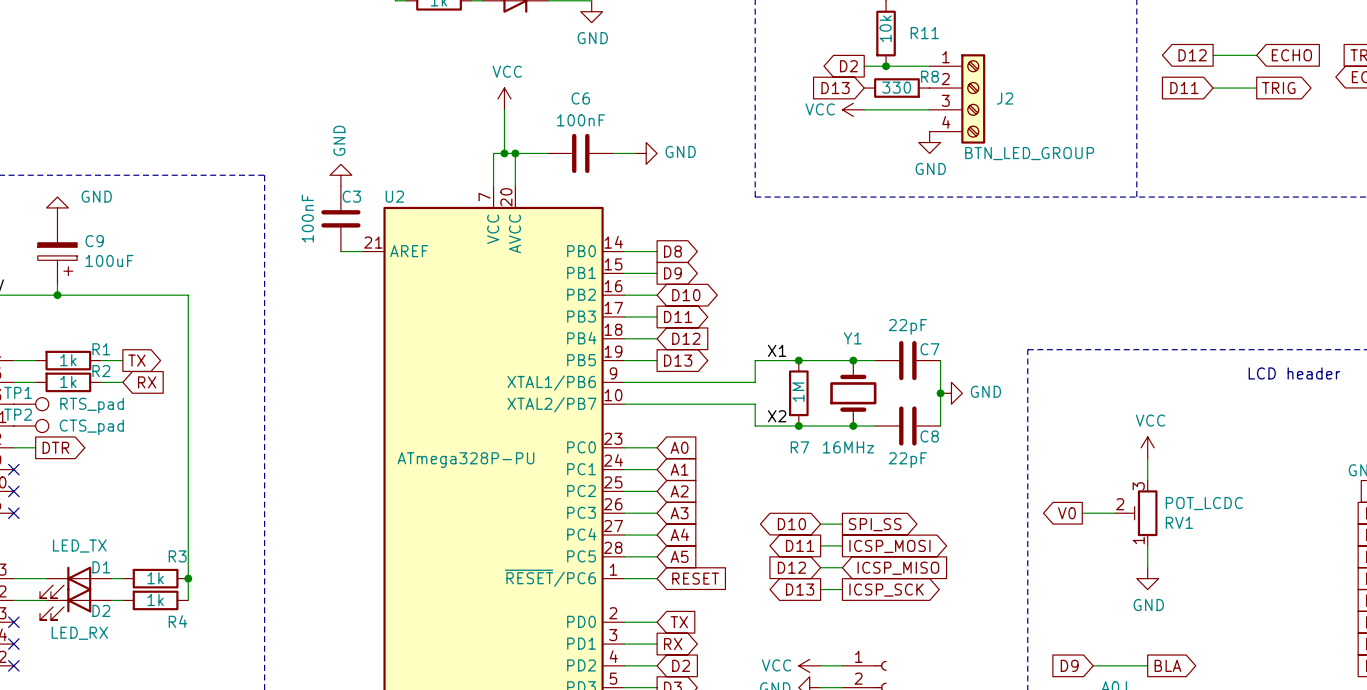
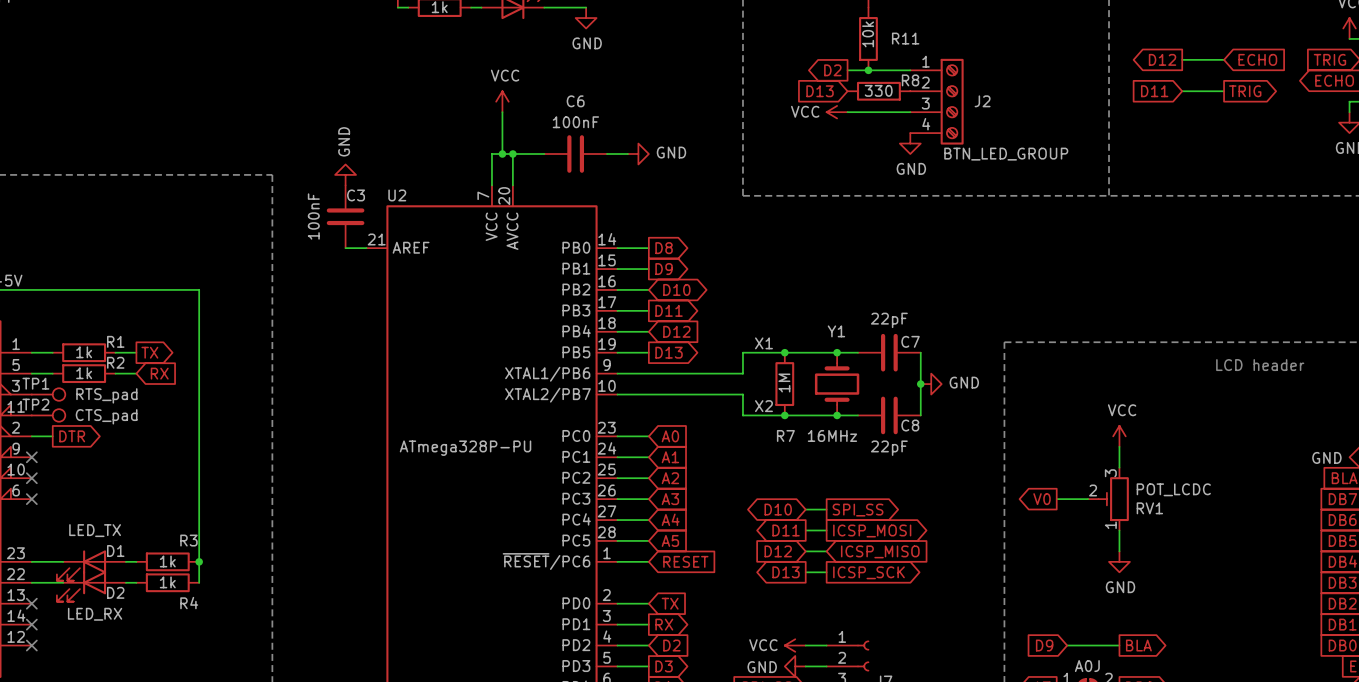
power symbol: GND (57, 207) -> none
C9: 100uF (57, 251) -> none
wire: (57, 284) (57, 295) -> none
junction: (57, 295) -> none

